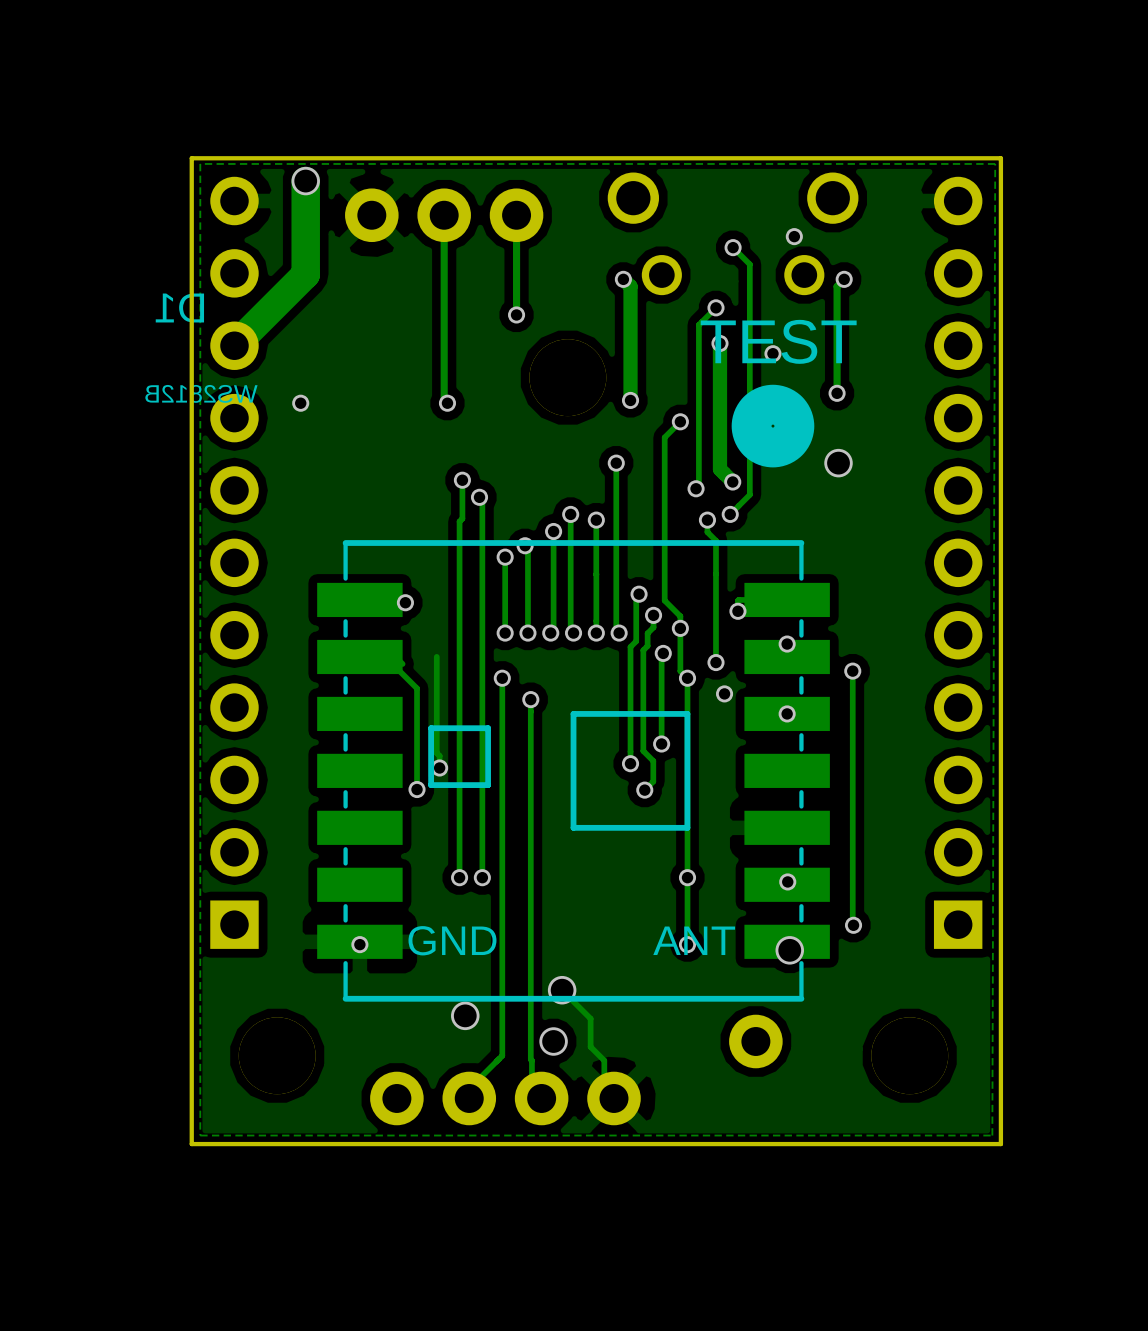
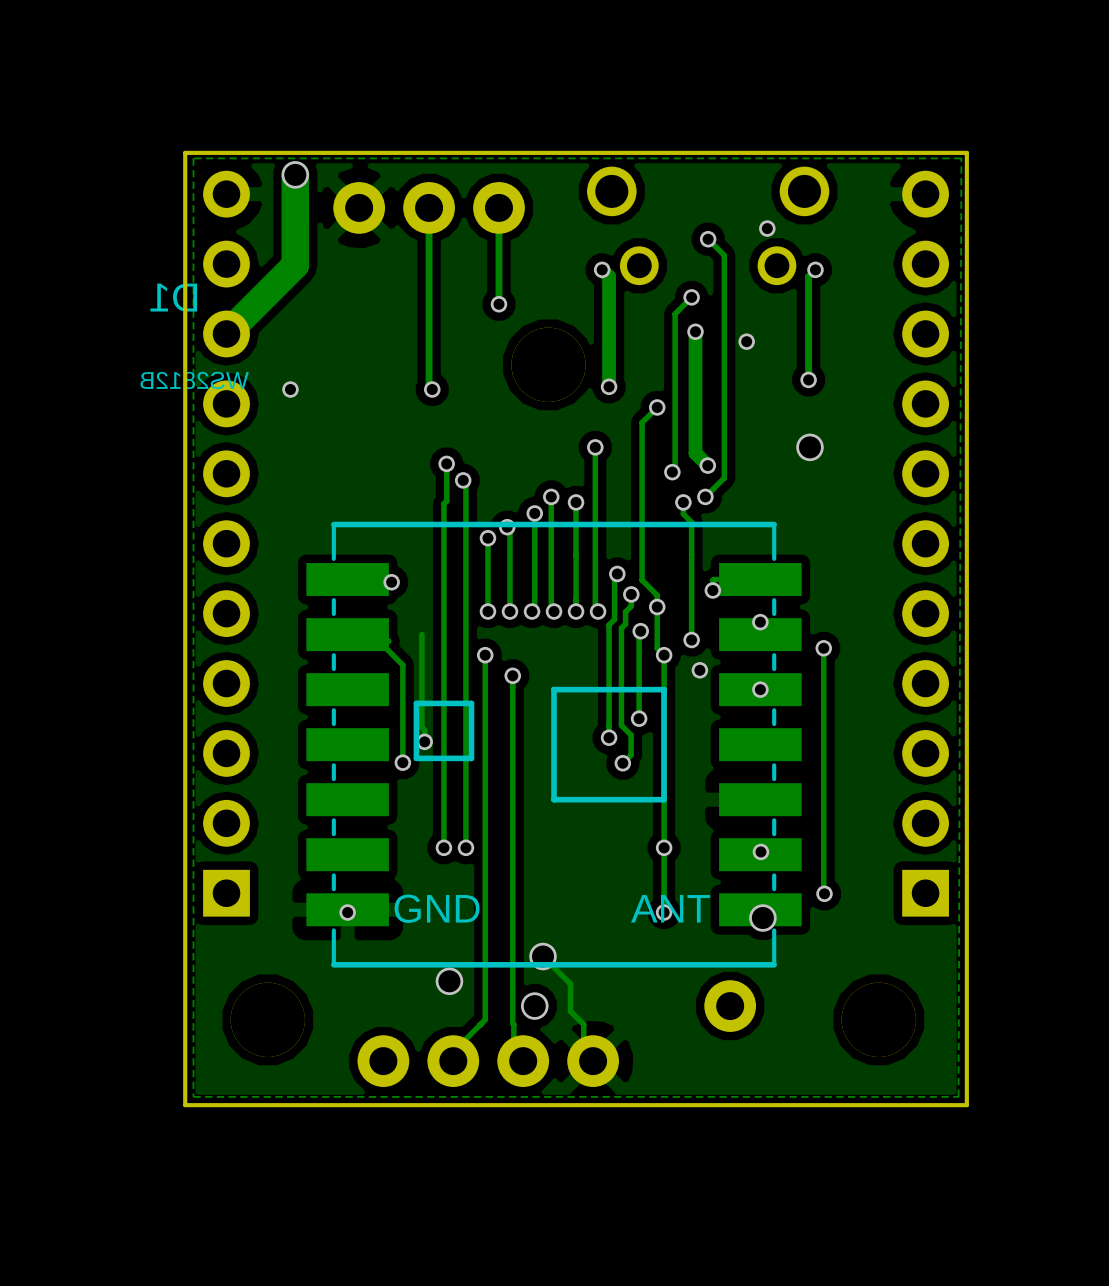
text: TEST (778, 341) -> none
drawing: [731, 384, 815, 468] -> none

